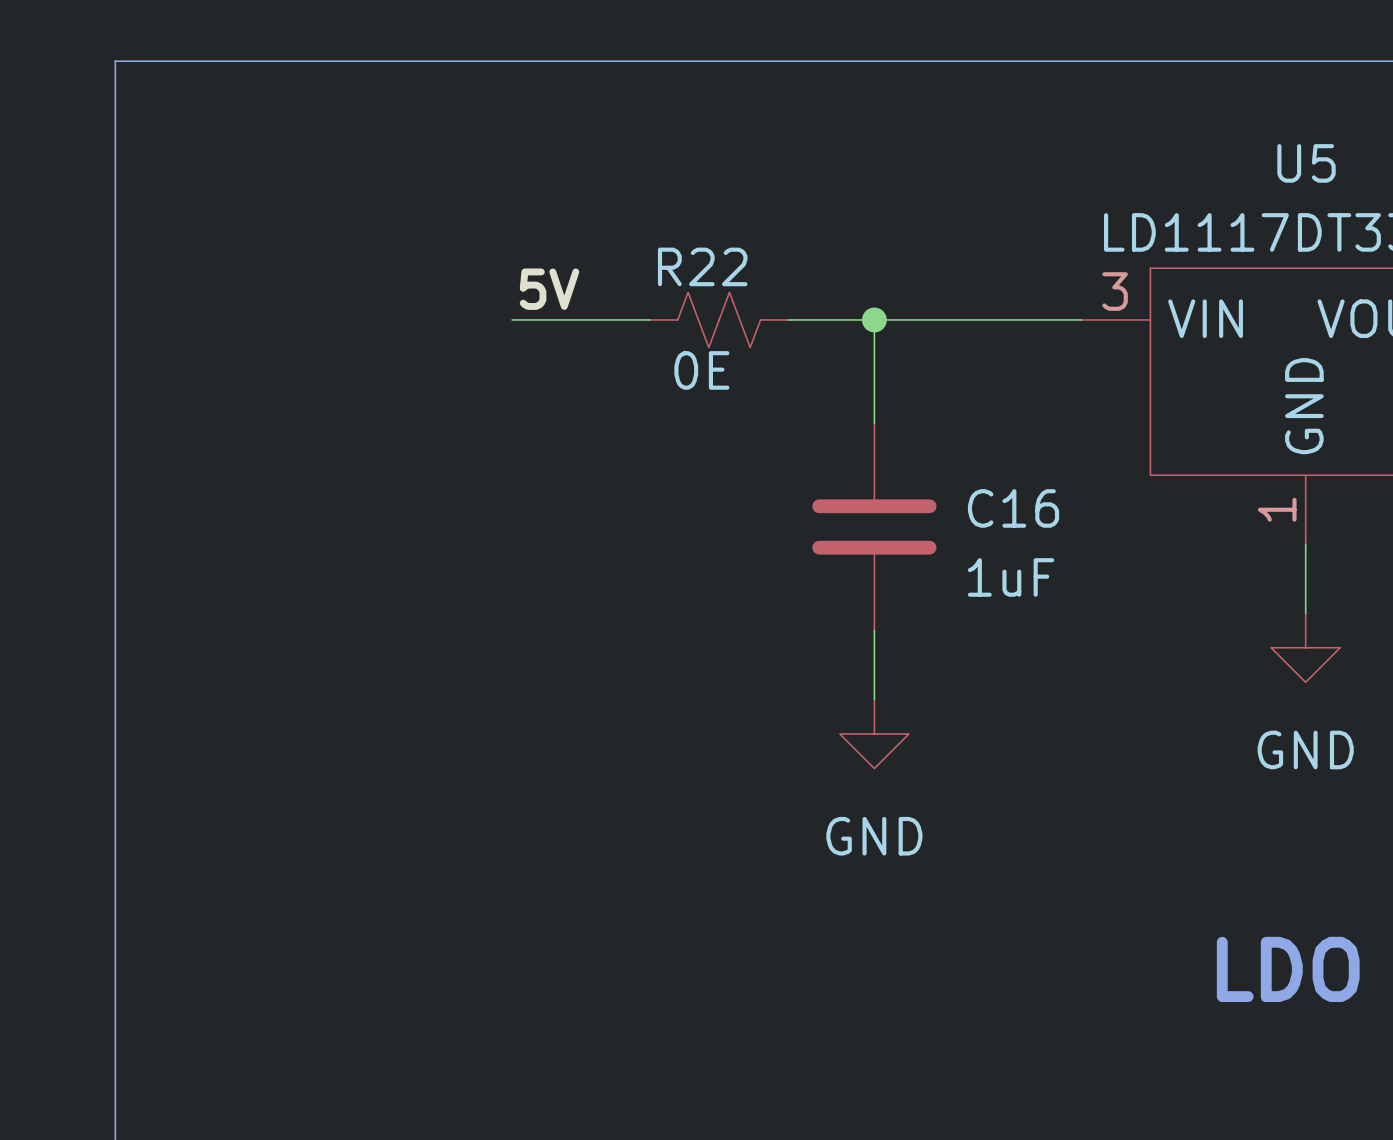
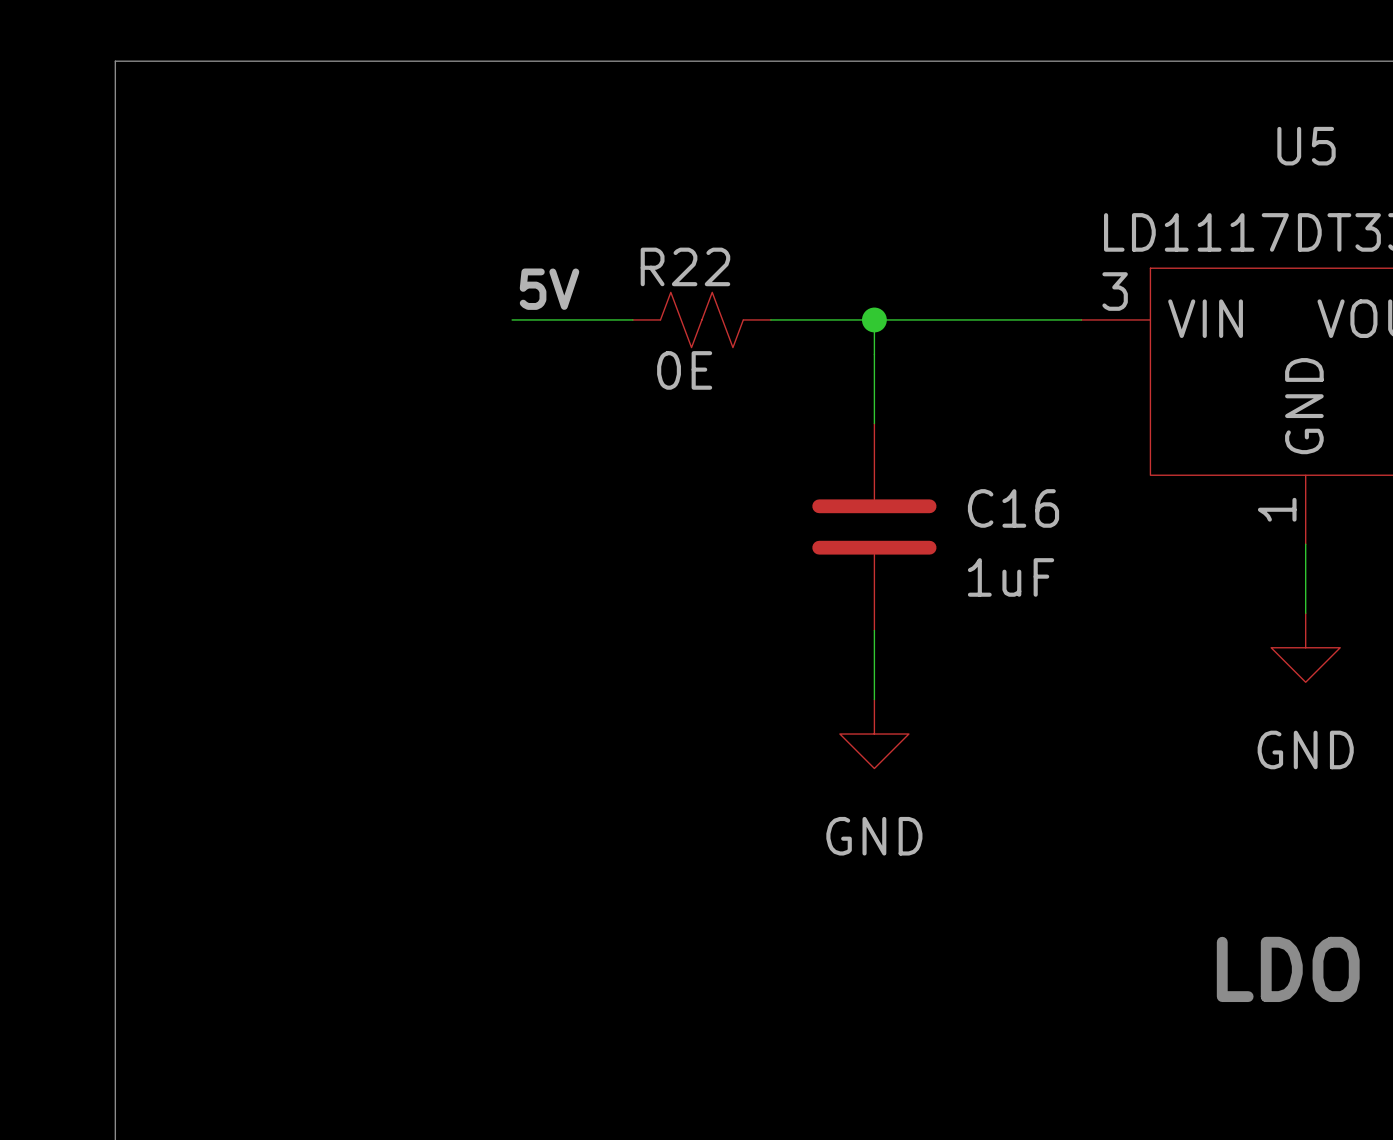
U5 name position: U5 (1306, 163) -> U5 (1306, 146)
R22 position: (719, 319) -> (701, 319)

